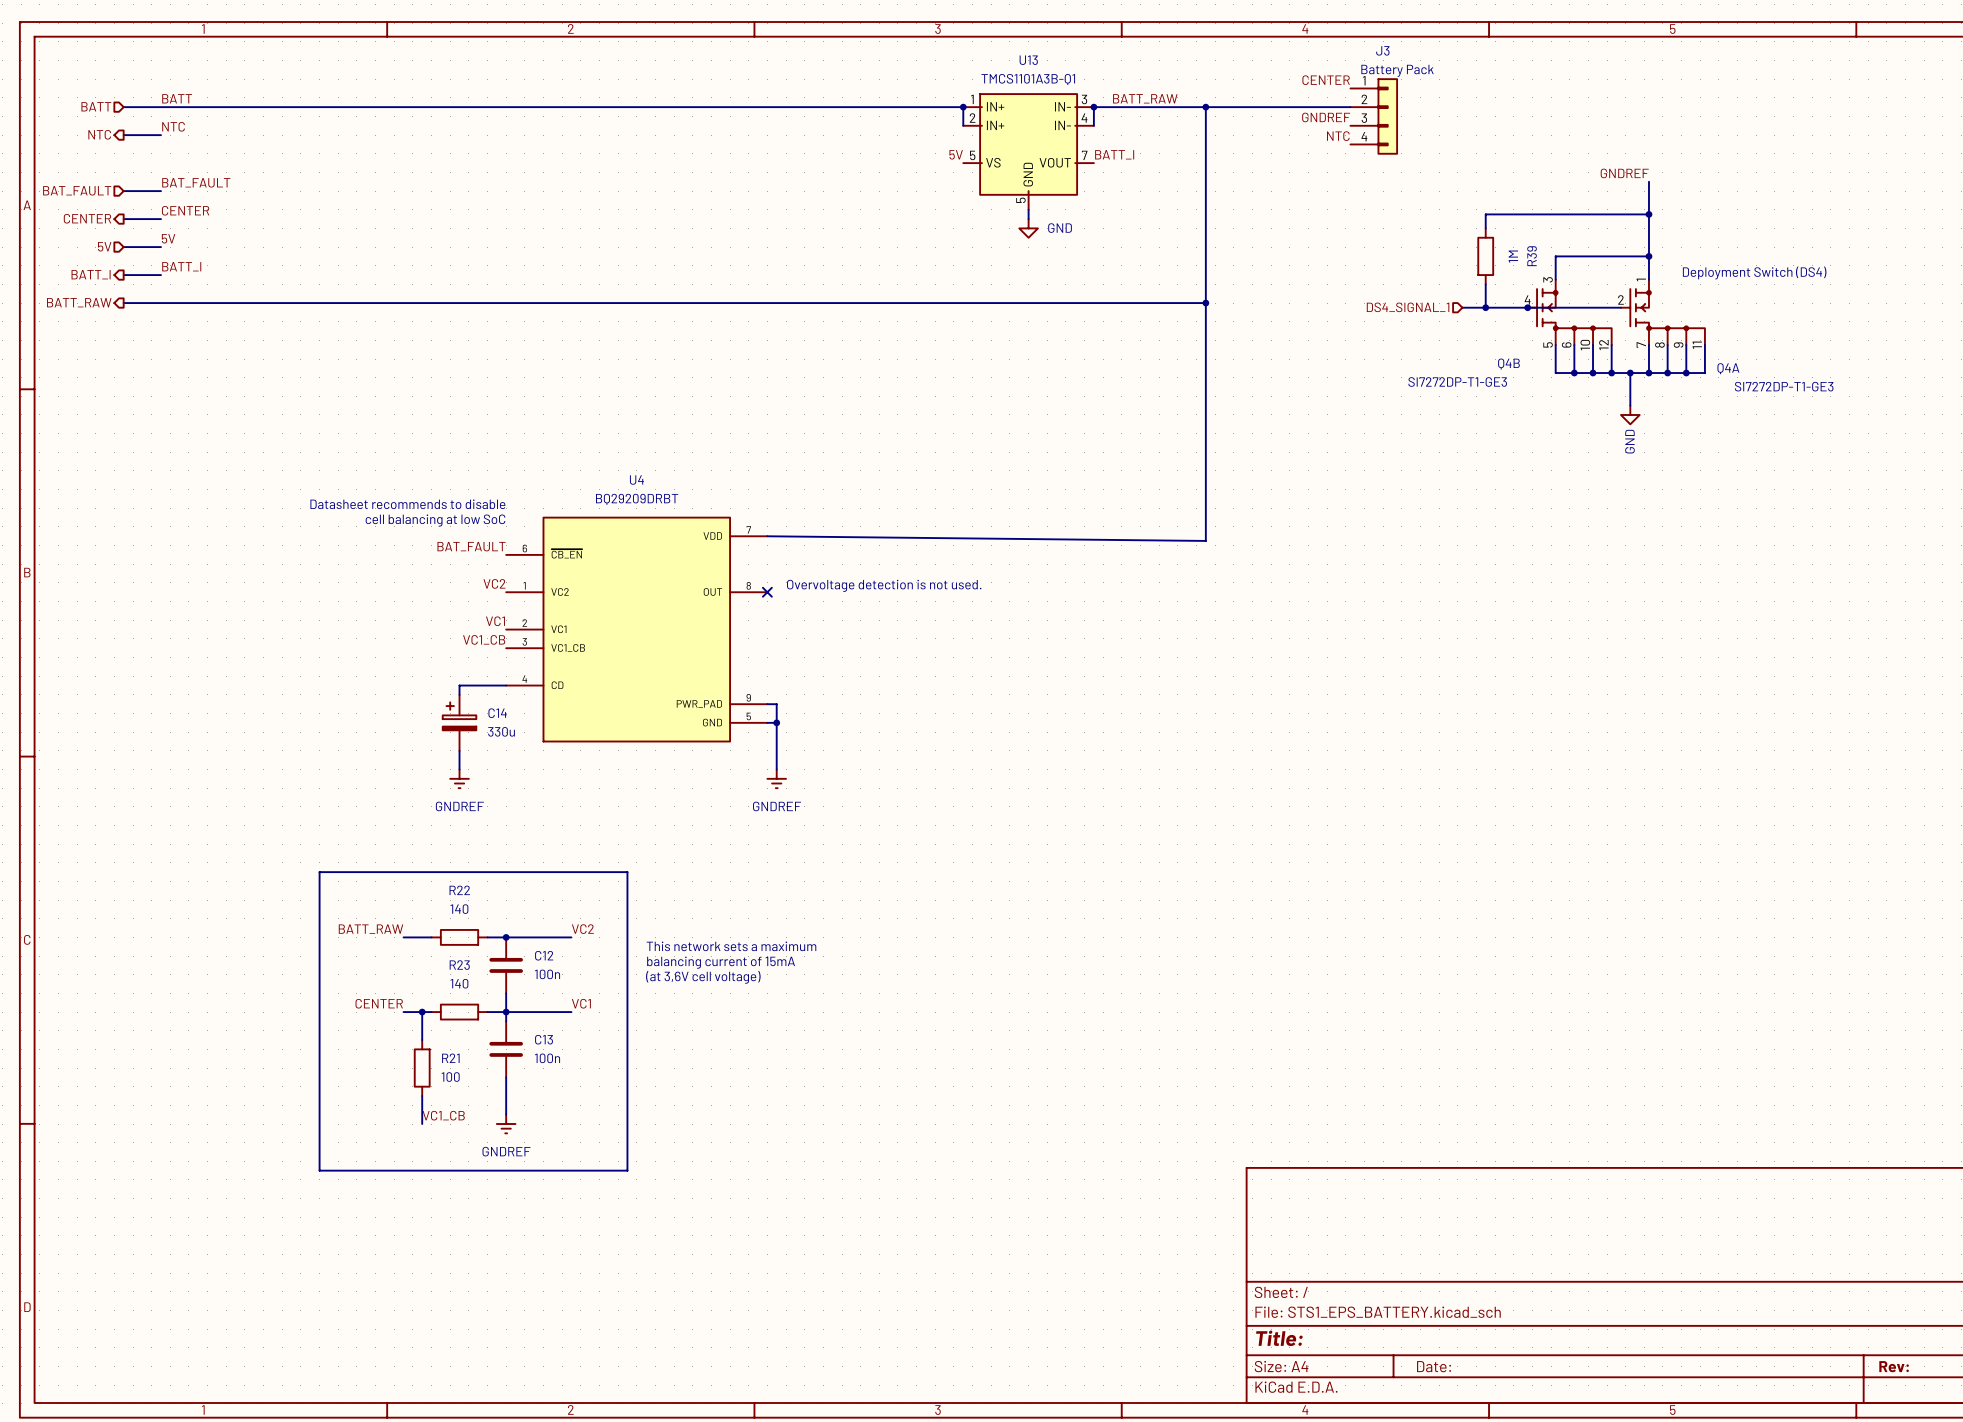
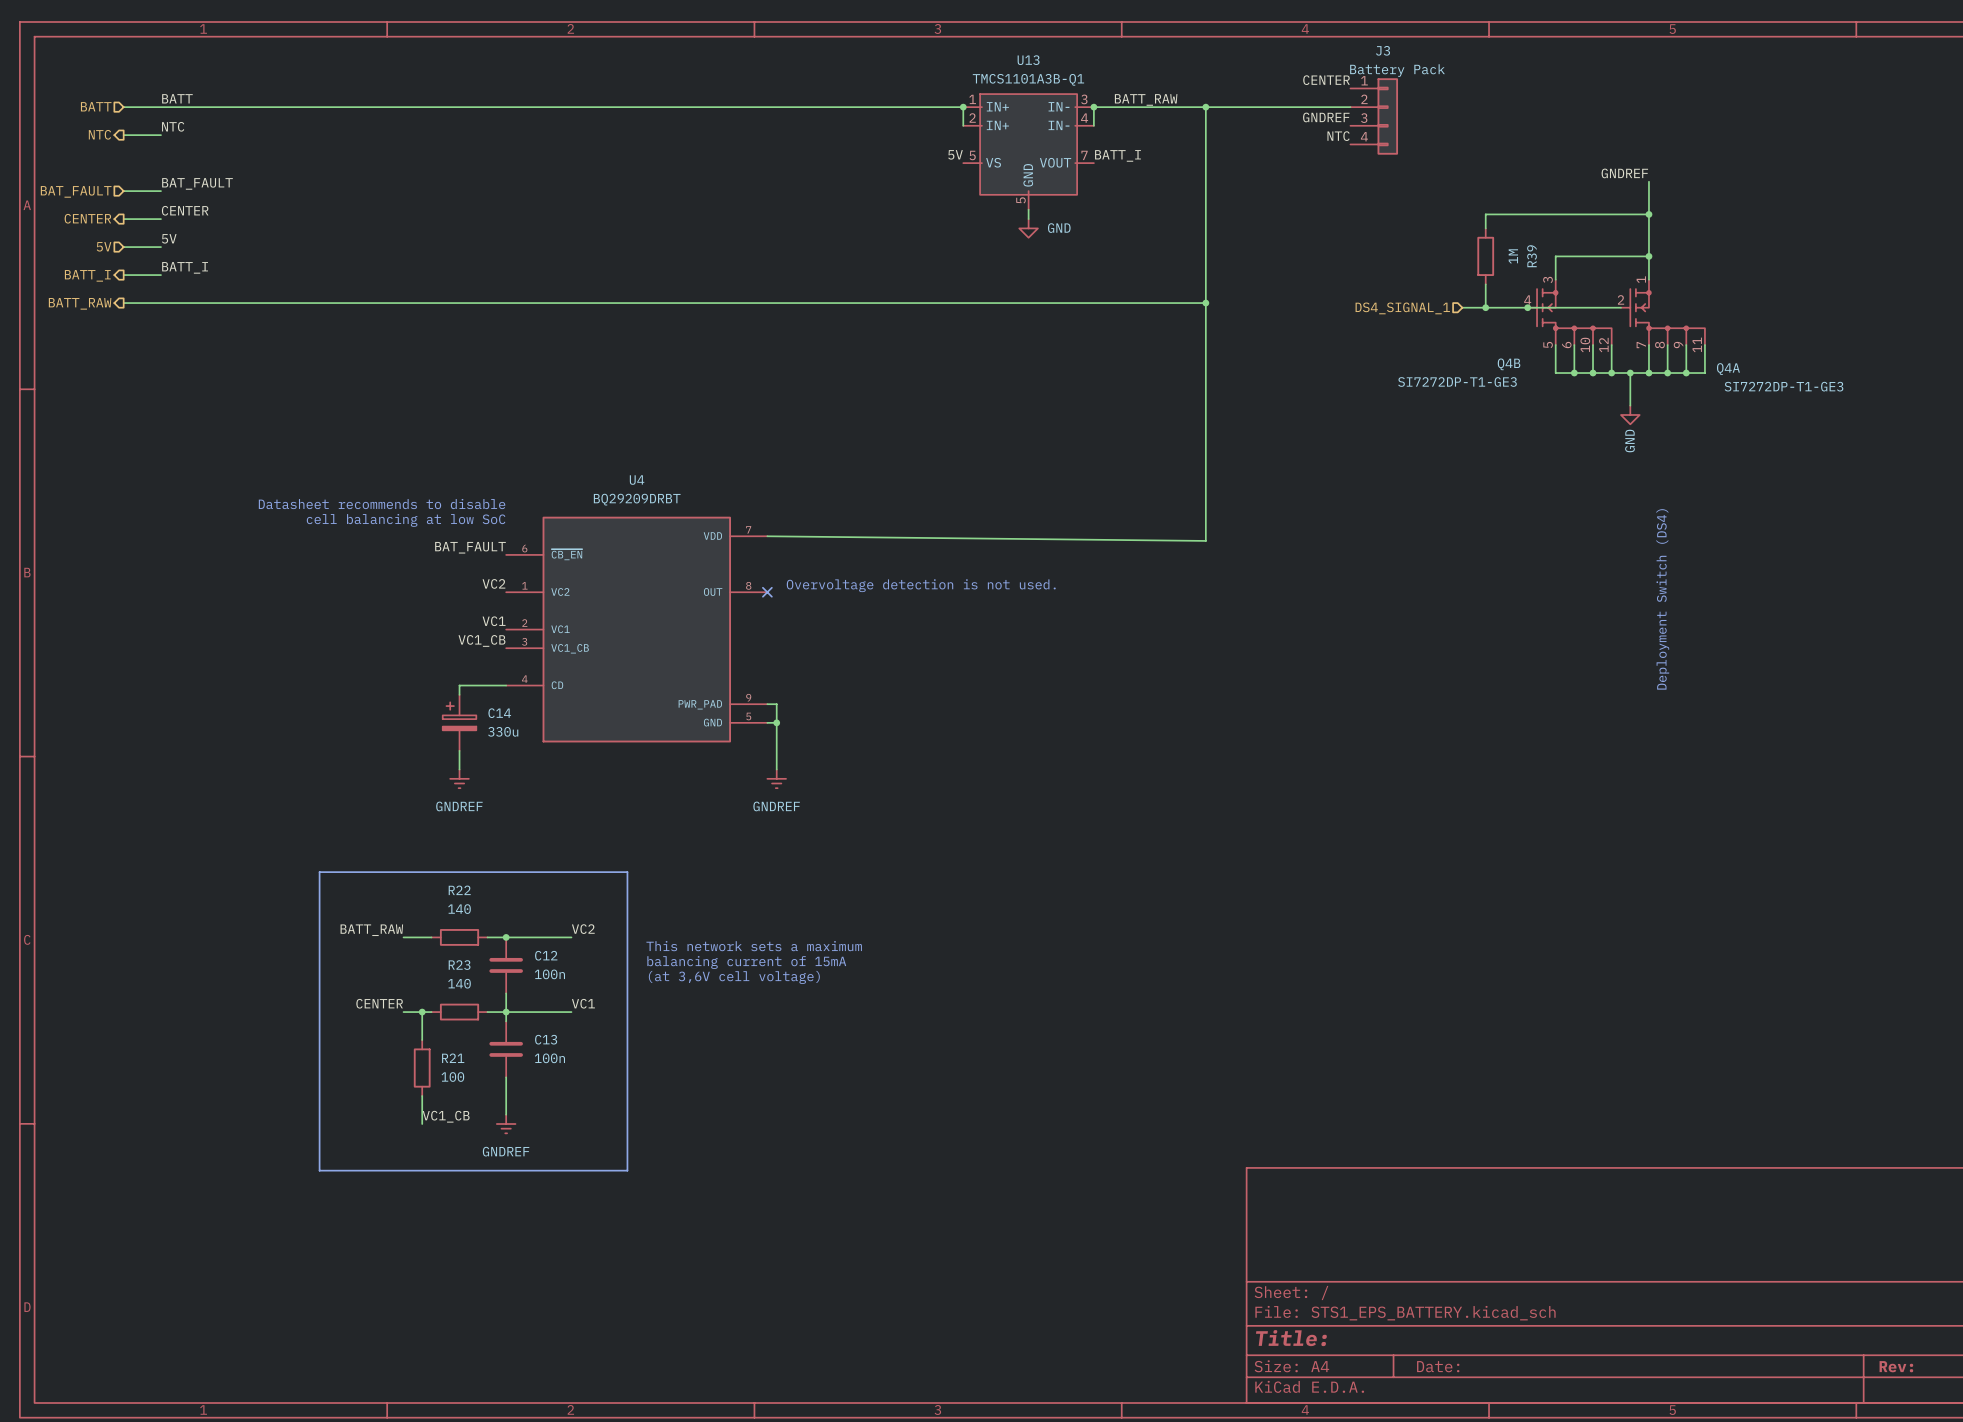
text: Deployment Switch (DS4) (1754, 272) -> none
text: none -> Deployment Switch (DS4) (1662, 599)

